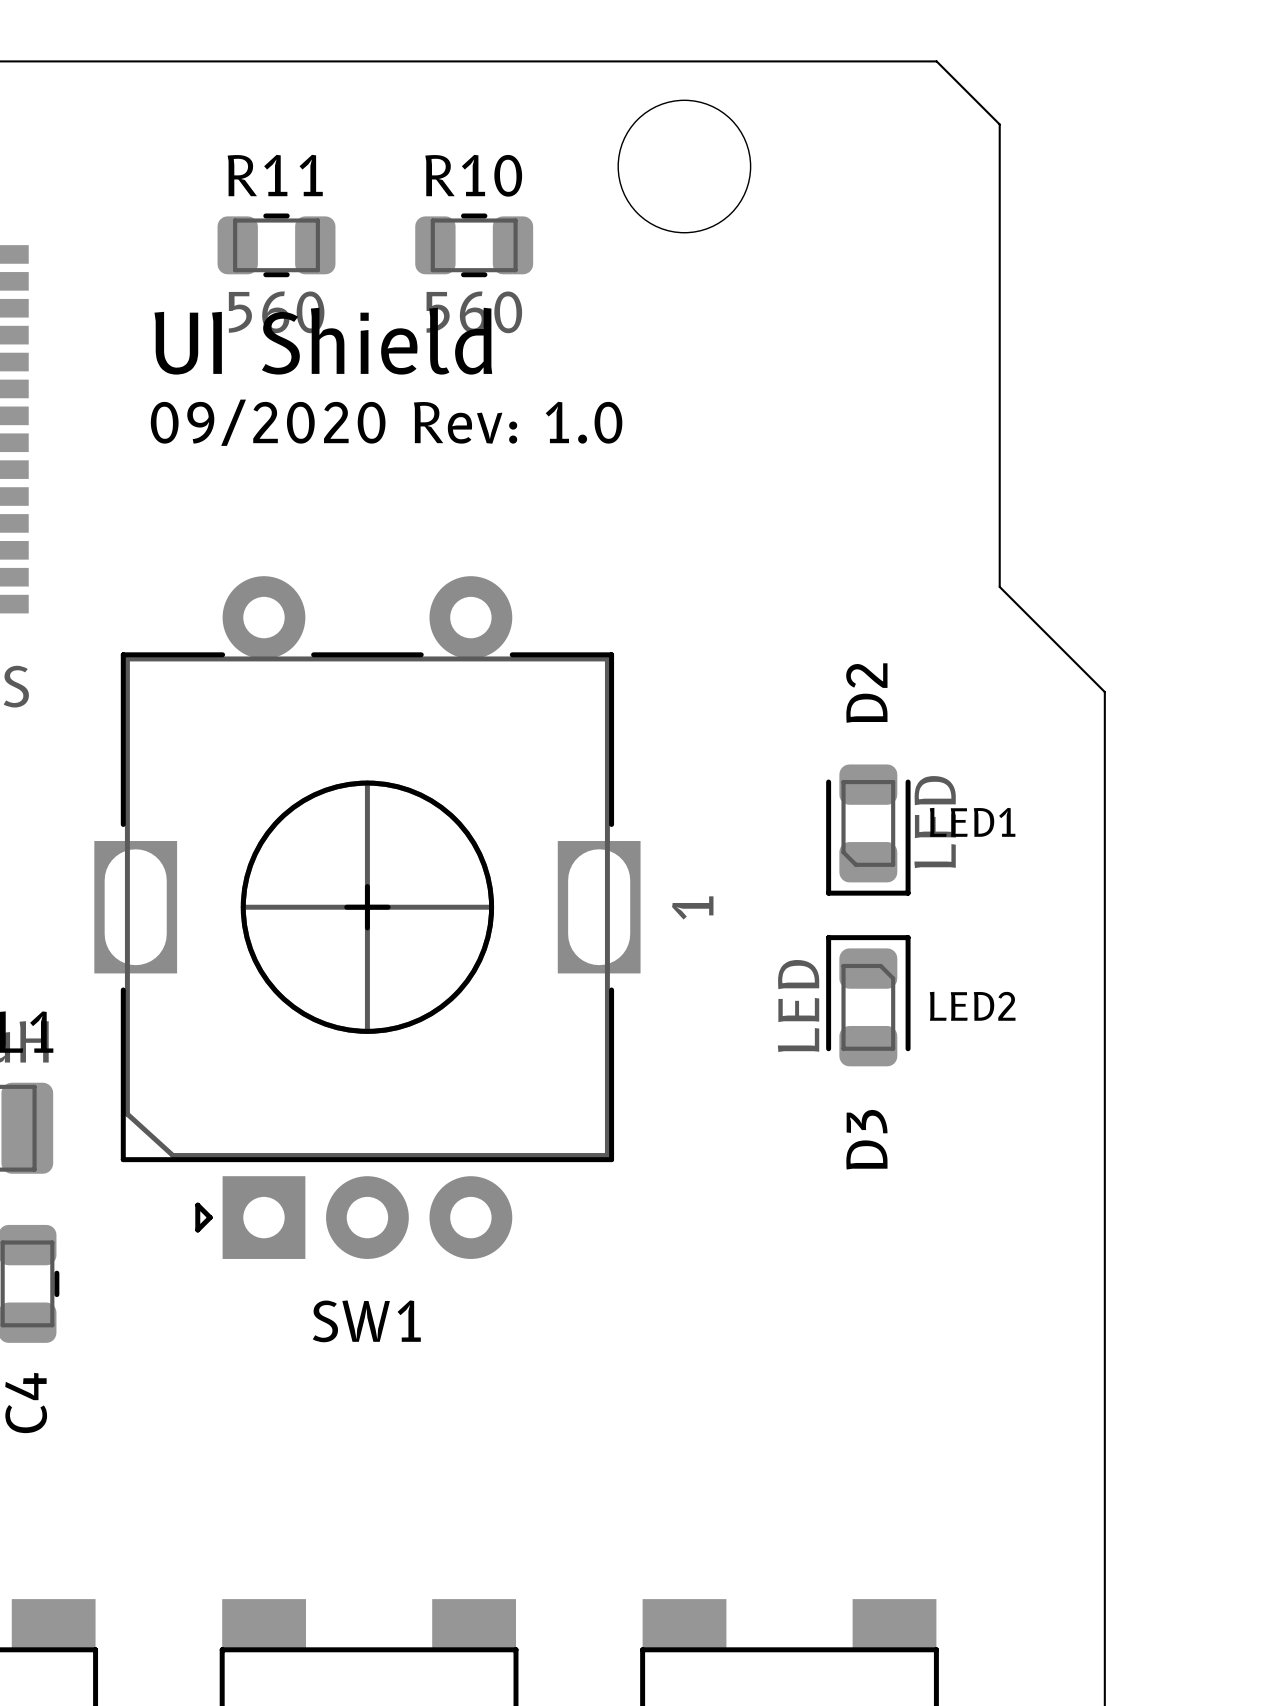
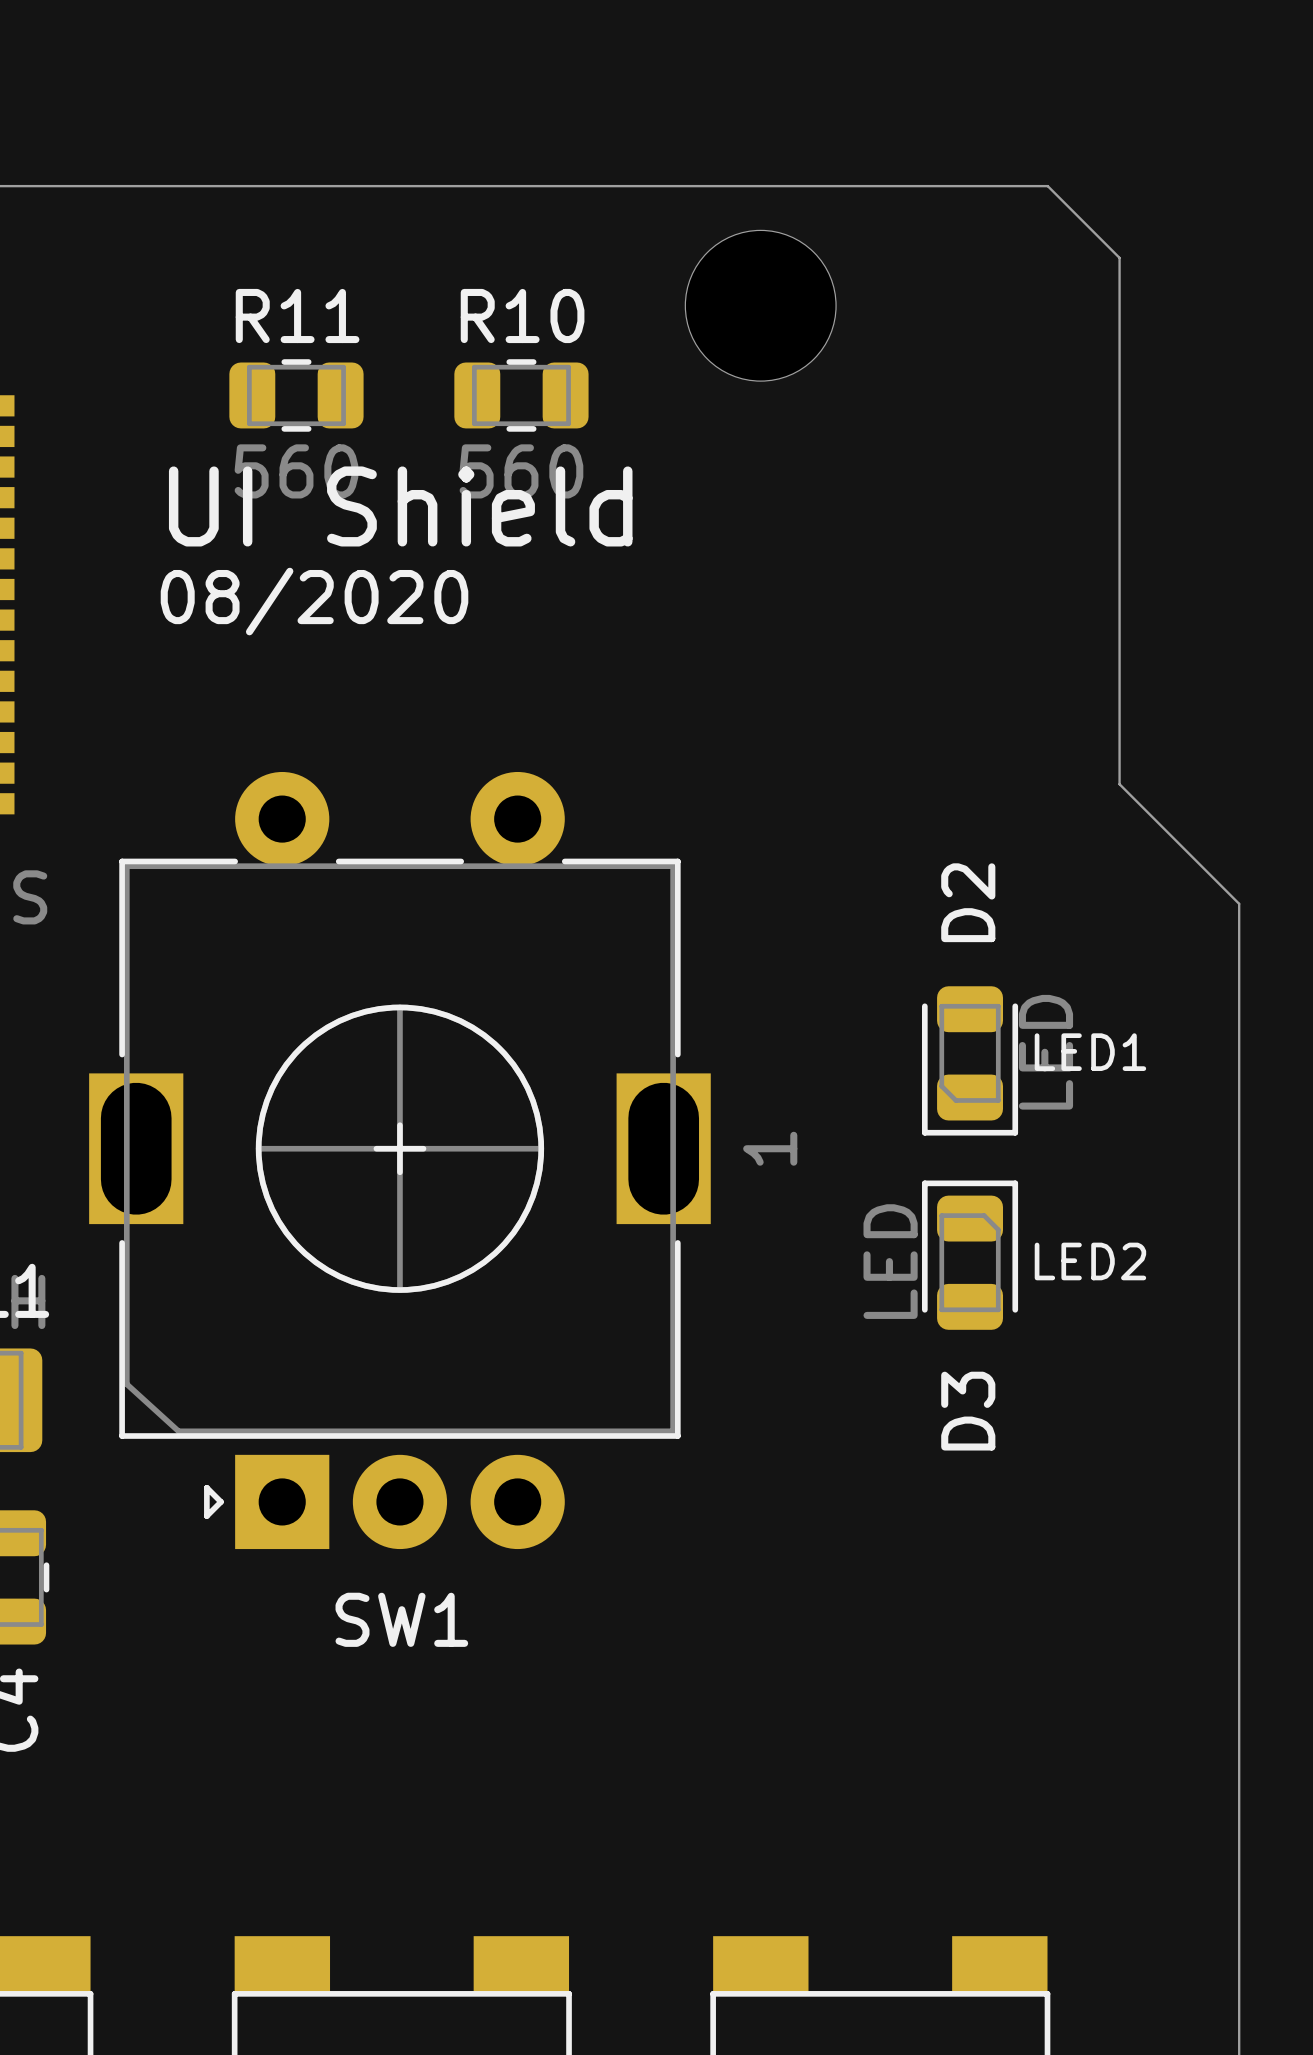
text: 09/2020 Rev: 1.0 (386, 422) -> 08/2020 (314, 601)

